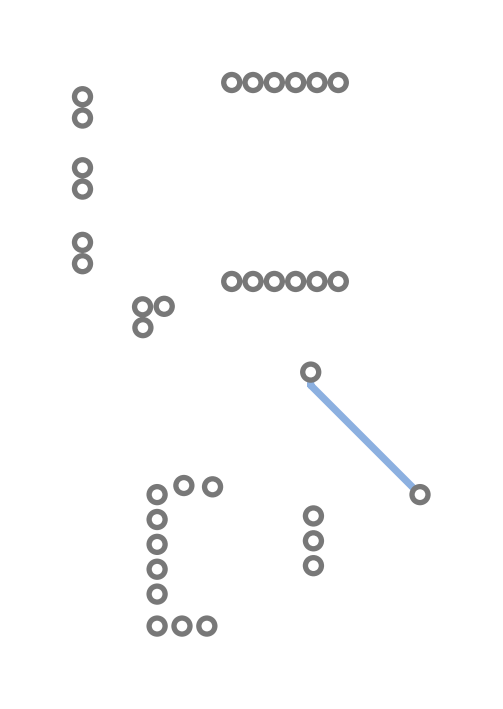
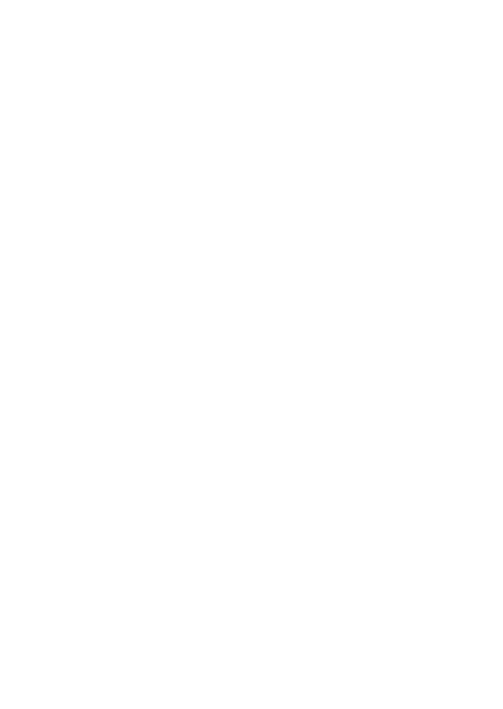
via: (231, 82) -> none
via: (253, 82) -> none
via: (274, 82) -> none
via: (295, 82) -> none
via: (316, 82) -> none
via: (338, 82) -> none
via: (82, 96) -> none
via: (82, 118) -> none
via: (82, 167) -> none
via: (82, 189) -> none
via: (82, 242) -> none
via: (82, 263) -> none
via: (231, 281) -> none
via: (253, 281) -> none
via: (274, 281) -> none
via: (295, 281) -> none
via: (316, 281) -> none
via: (338, 281) -> none
via: (142, 306) -> none
via: (164, 306) -> none
via: (142, 327) -> none
track: (310, 372) (310, 385) (420, 494) -> none
via: (310, 372) -> none
via: (183, 485) -> none
via: (212, 486) -> none
via: (157, 494) -> none
via: (420, 494) -> none
via: (313, 515) -> none
via: (157, 519) -> none
via: (313, 540) -> none
via: (157, 544) -> none
via: (313, 565) -> none
via: (157, 569) -> none
via: (157, 594) -> none
via: (157, 626) -> none
via: (181, 626) -> none
via: (206, 626) -> none

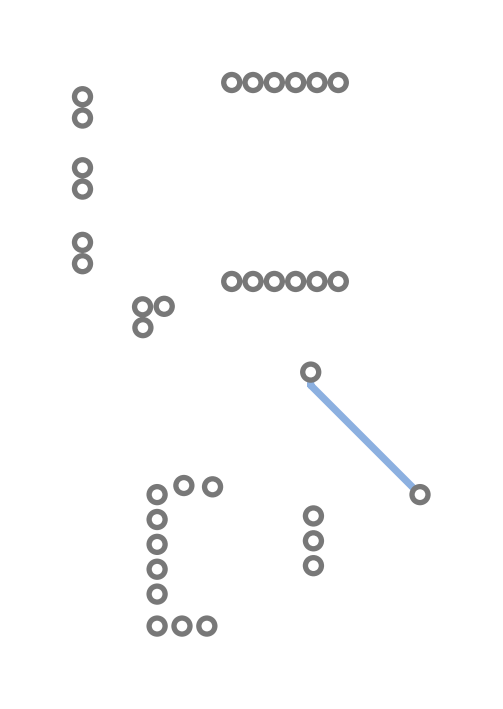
via: none -> (231, 82)
via: none -> (253, 82)
via: none -> (274, 82)
via: none -> (295, 82)
via: none -> (316, 82)
via: none -> (338, 82)
via: none -> (82, 96)
via: none -> (82, 118)
via: none -> (82, 167)
via: none -> (82, 189)
via: none -> (82, 242)
via: none -> (82, 263)
via: none -> (231, 281)
via: none -> (253, 281)
via: none -> (274, 281)
via: none -> (295, 281)
via: none -> (316, 281)
via: none -> (338, 281)
via: none -> (142, 306)
via: none -> (164, 306)
via: none -> (142, 327)
track: none -> (310, 372) (310, 385) (420, 494)
via: none -> (310, 372)
via: none -> (183, 485)
via: none -> (212, 486)
via: none -> (157, 494)
via: none -> (420, 494)
via: none -> (313, 515)
via: none -> (157, 519)
via: none -> (313, 540)
via: none -> (157, 544)
via: none -> (313, 565)
via: none -> (157, 569)
via: none -> (157, 594)
via: none -> (157, 626)
via: none -> (181, 626)
via: none -> (206, 626)

